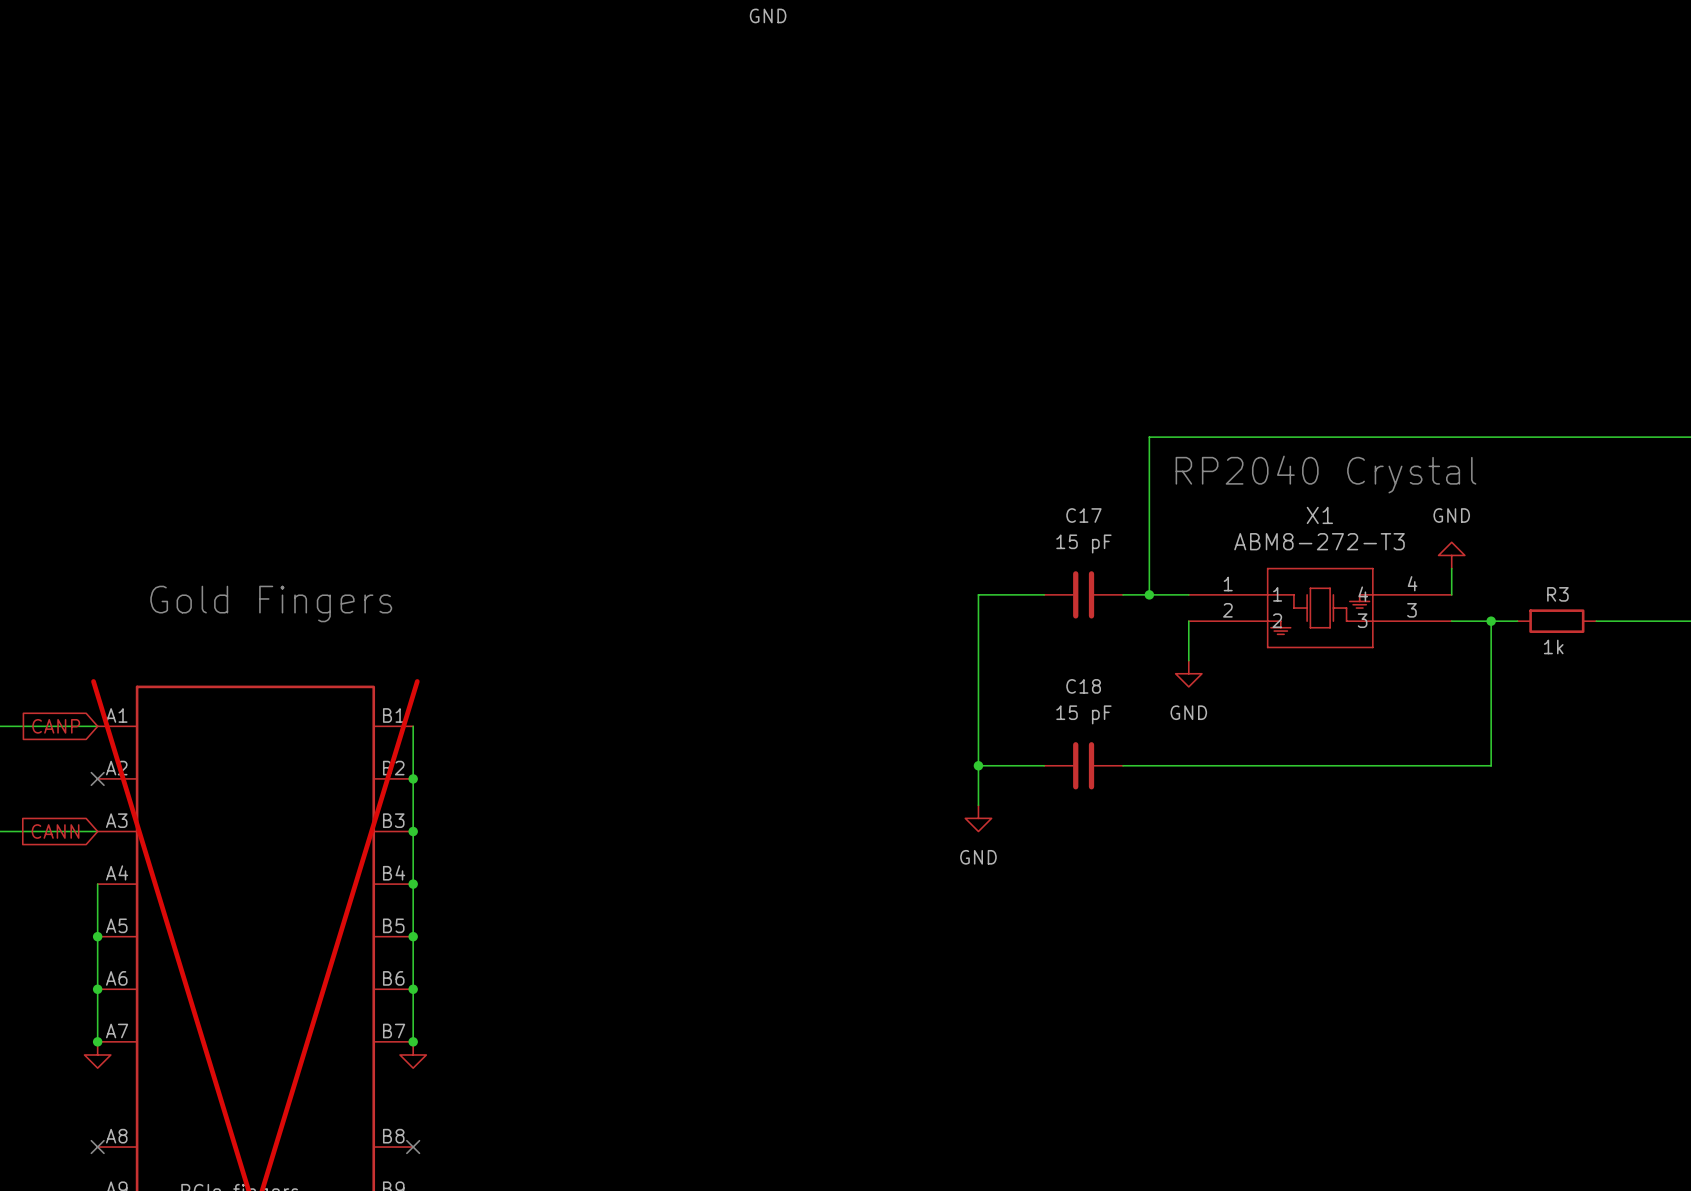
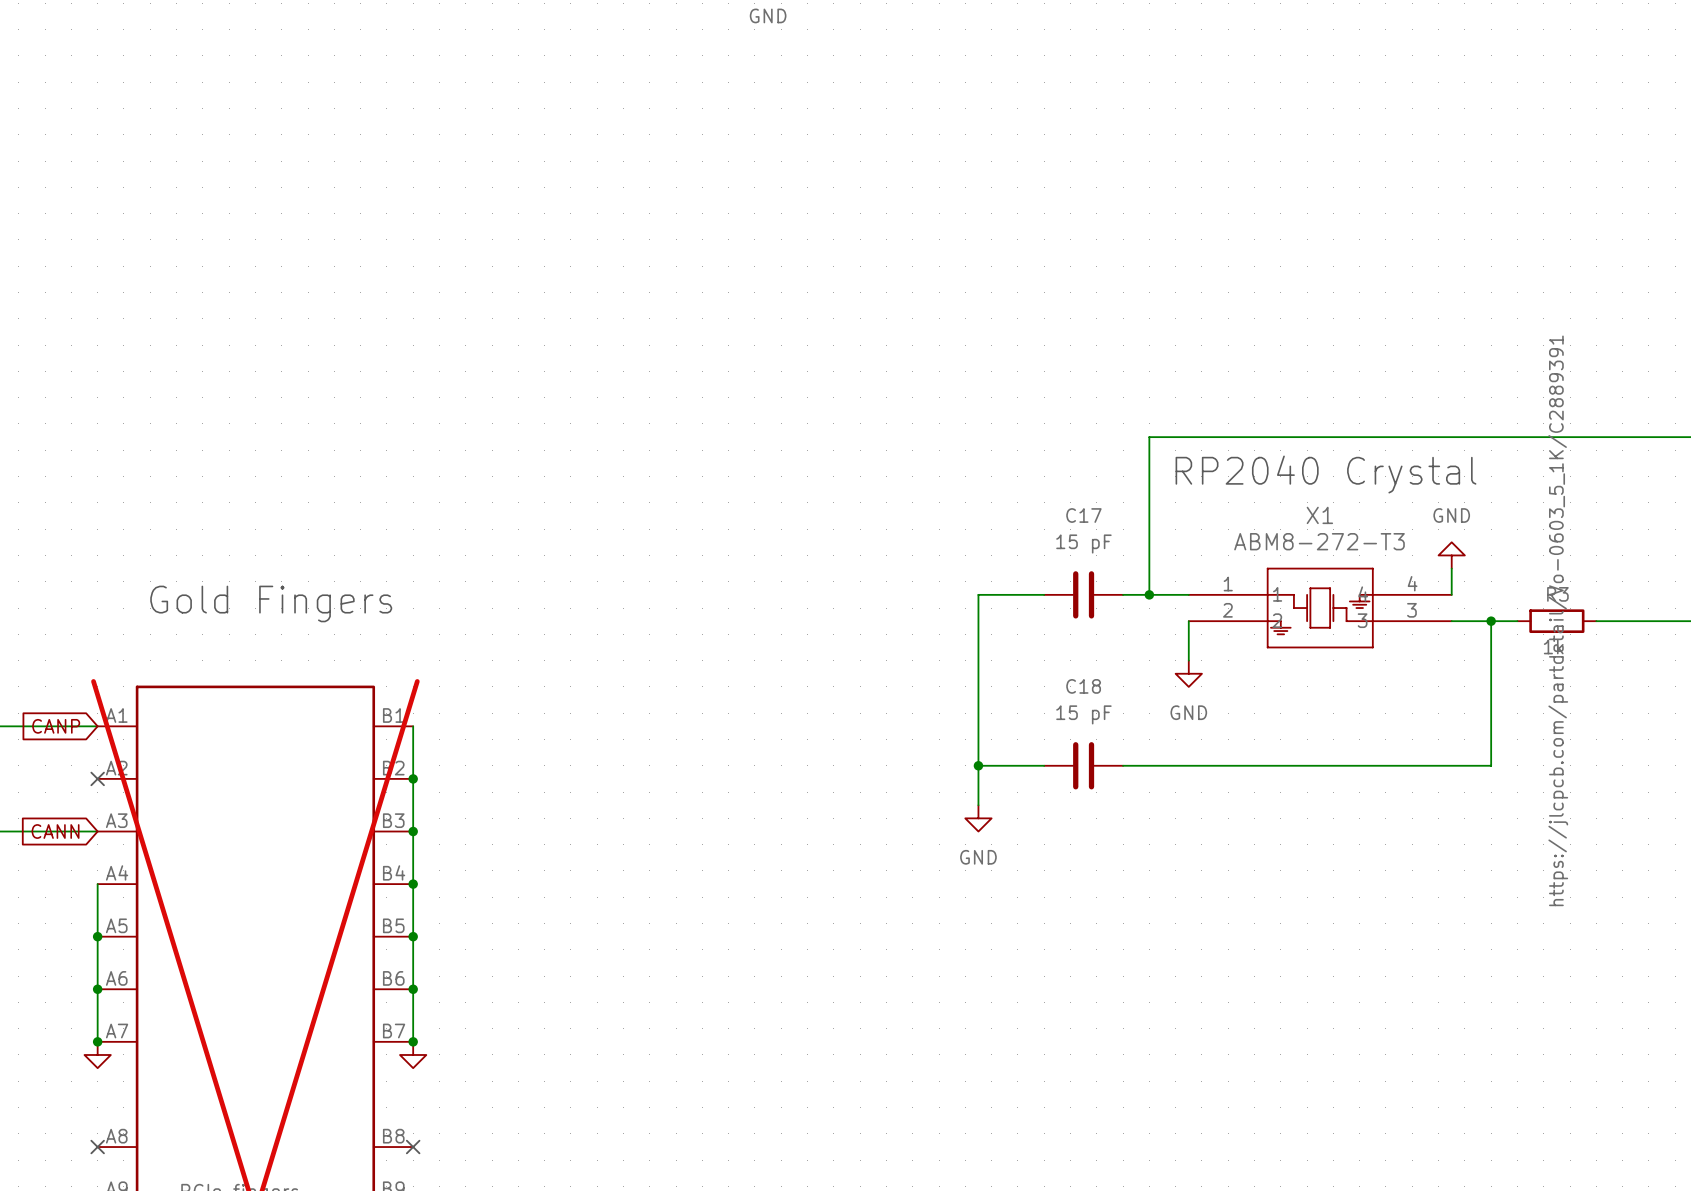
R3 text: none -> https://jlcpcb.com/partdetail/Vo-0603_5_1K/C2889391 (1558, 620)

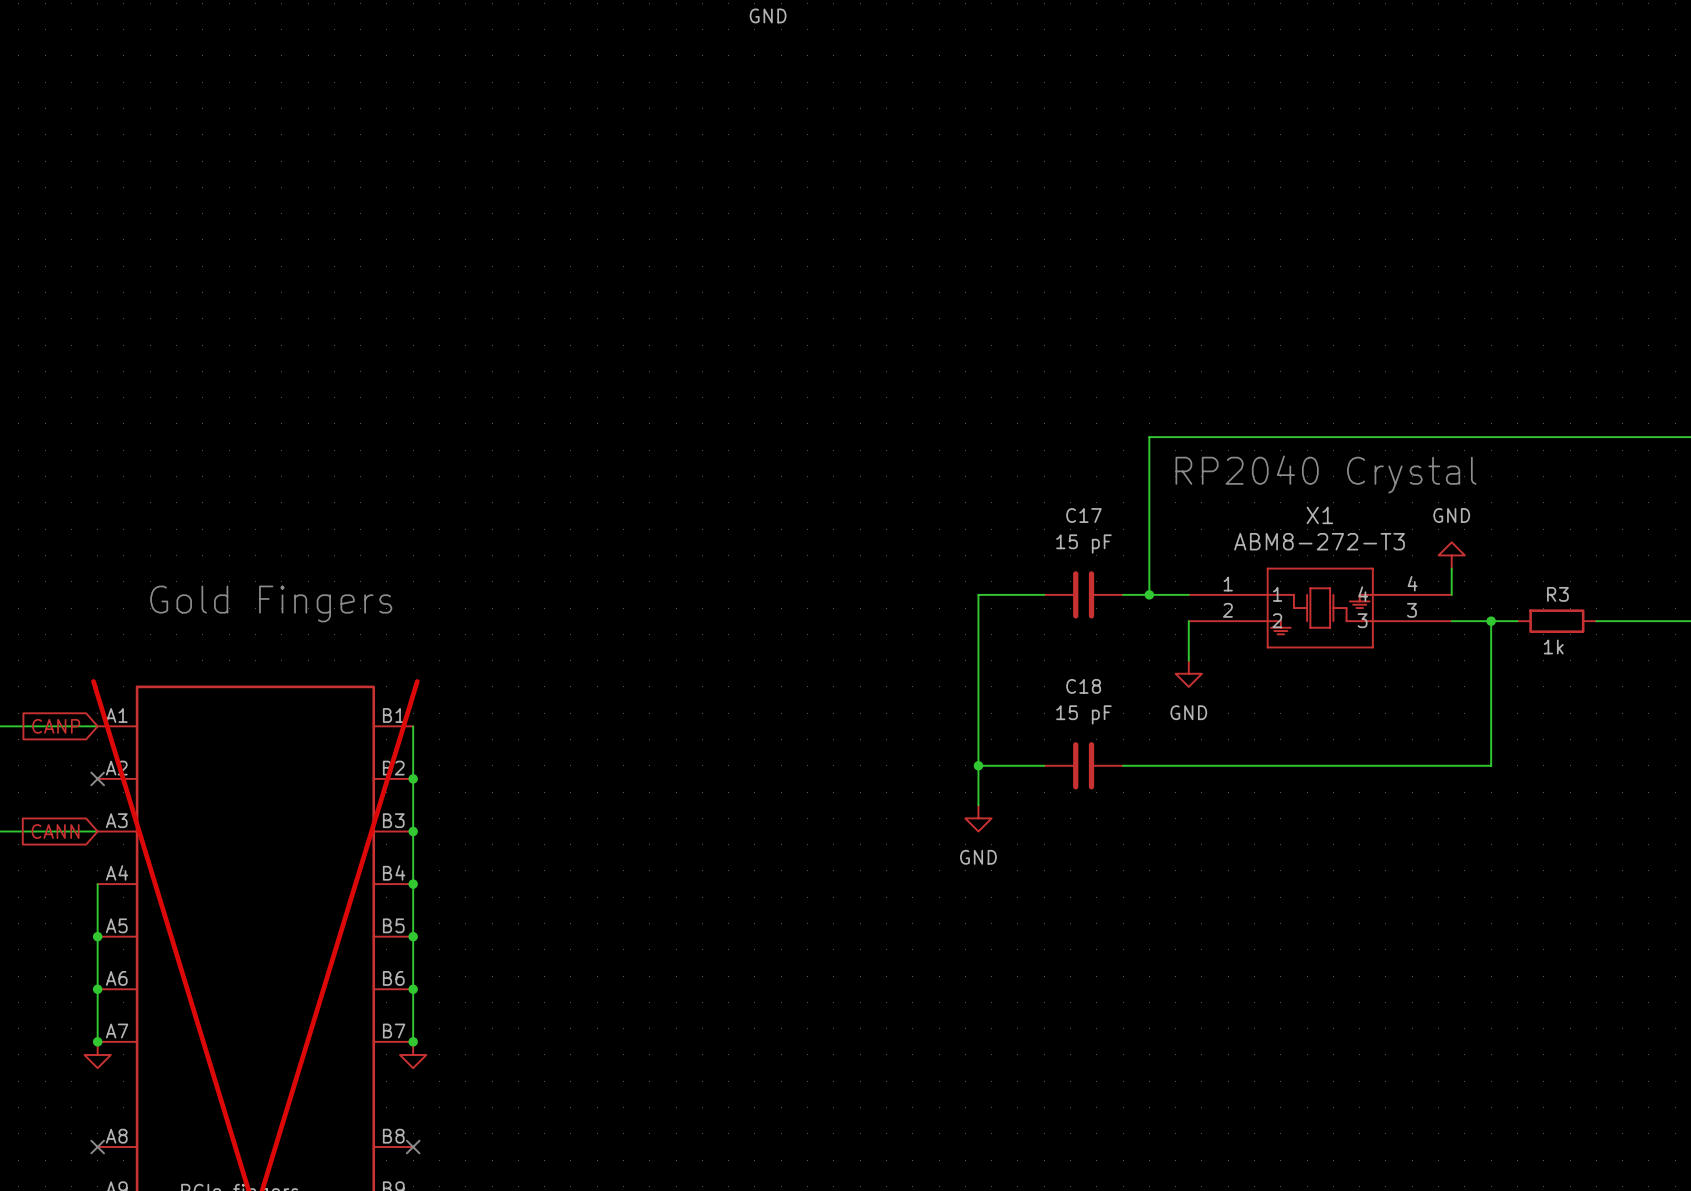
R3 text: https://jlcpcb.com/partdetail/Vo-0603_5_1K/C2889391 (1558, 620) -> none

